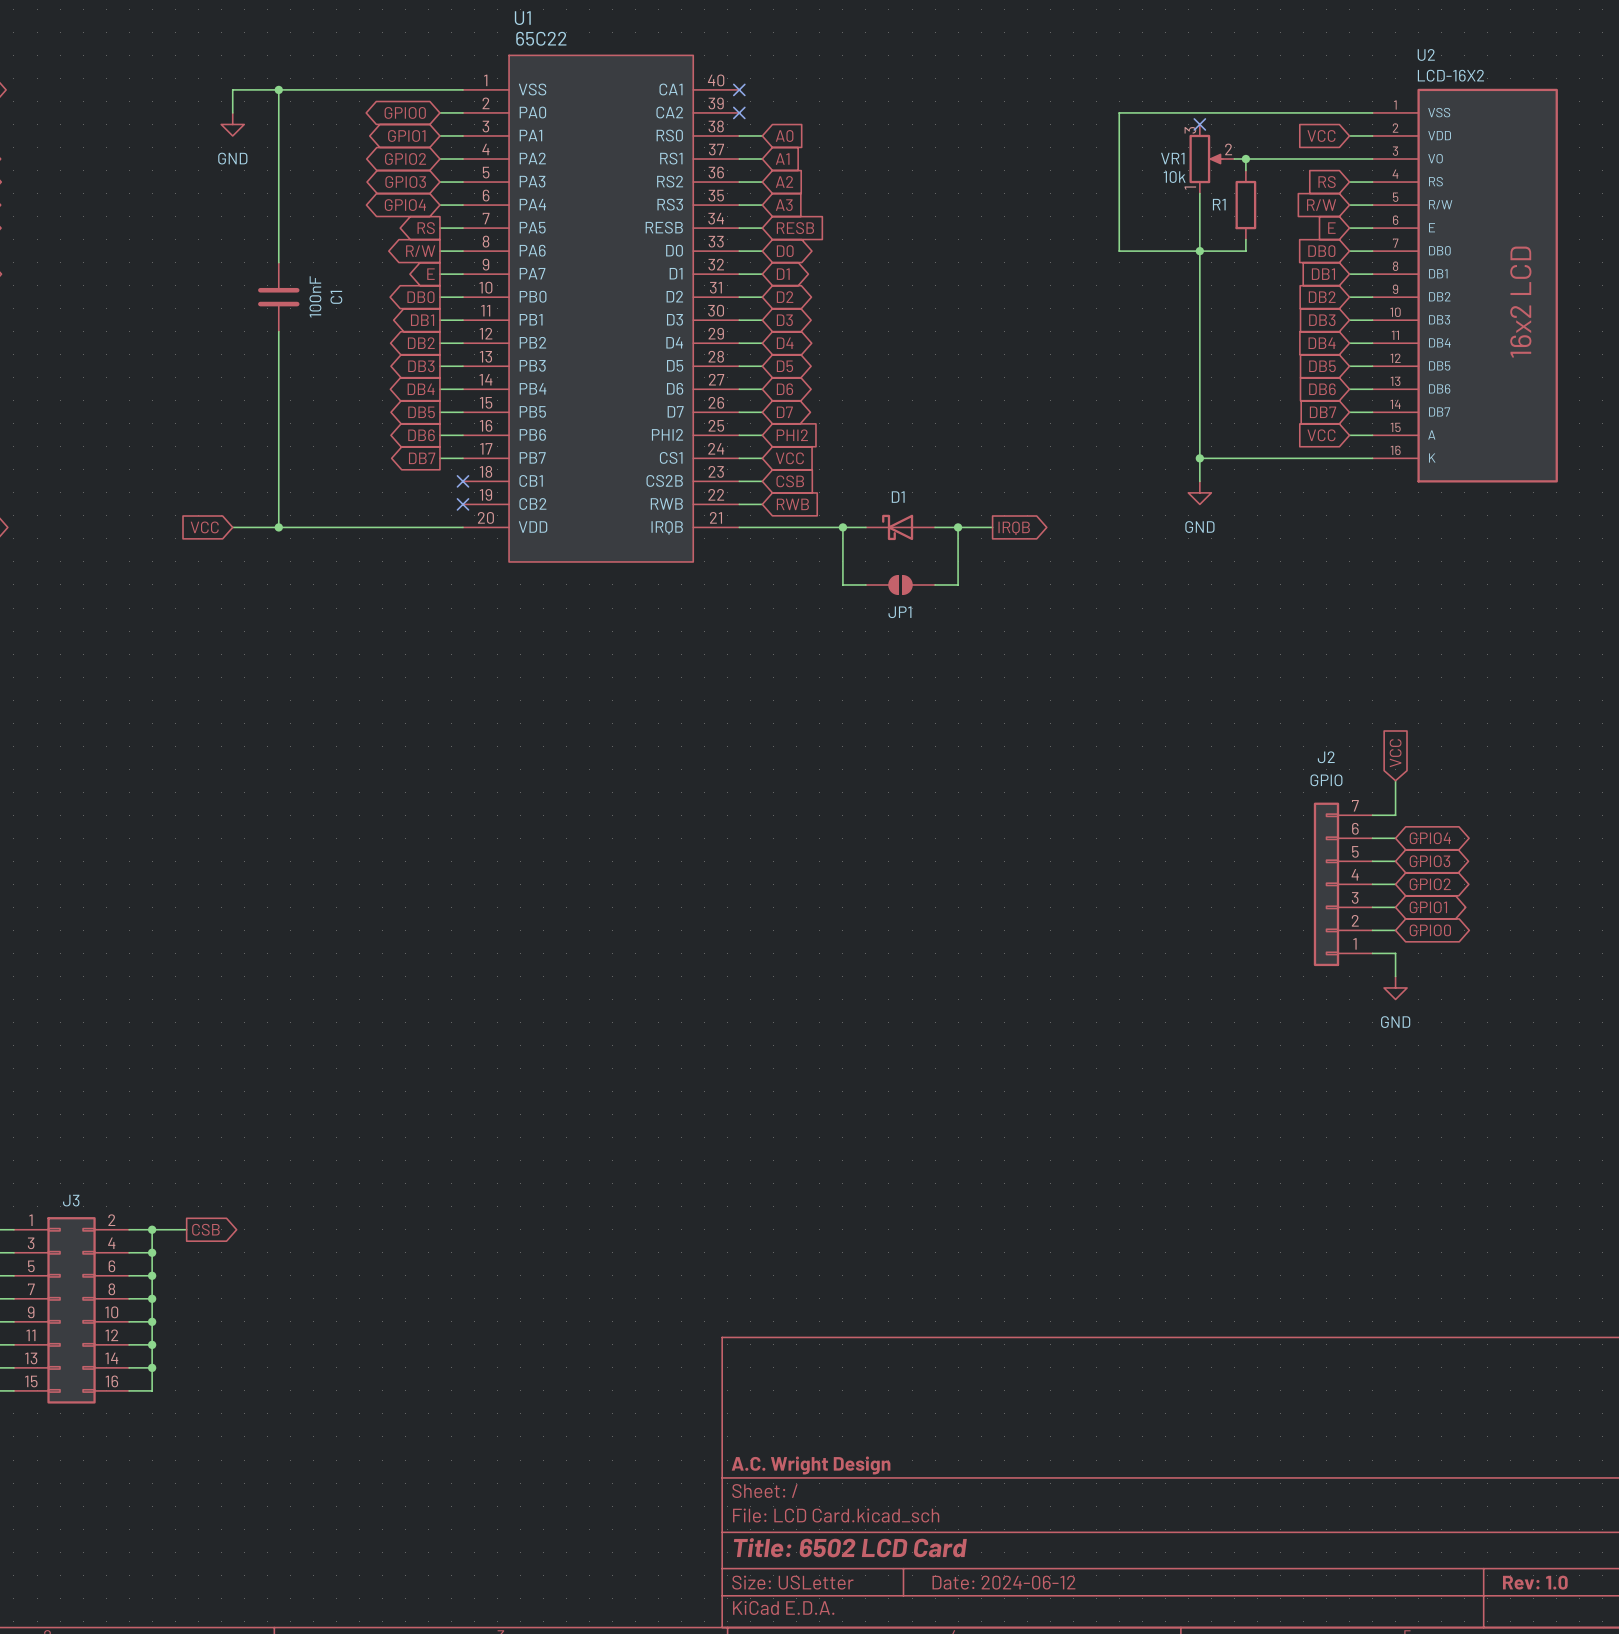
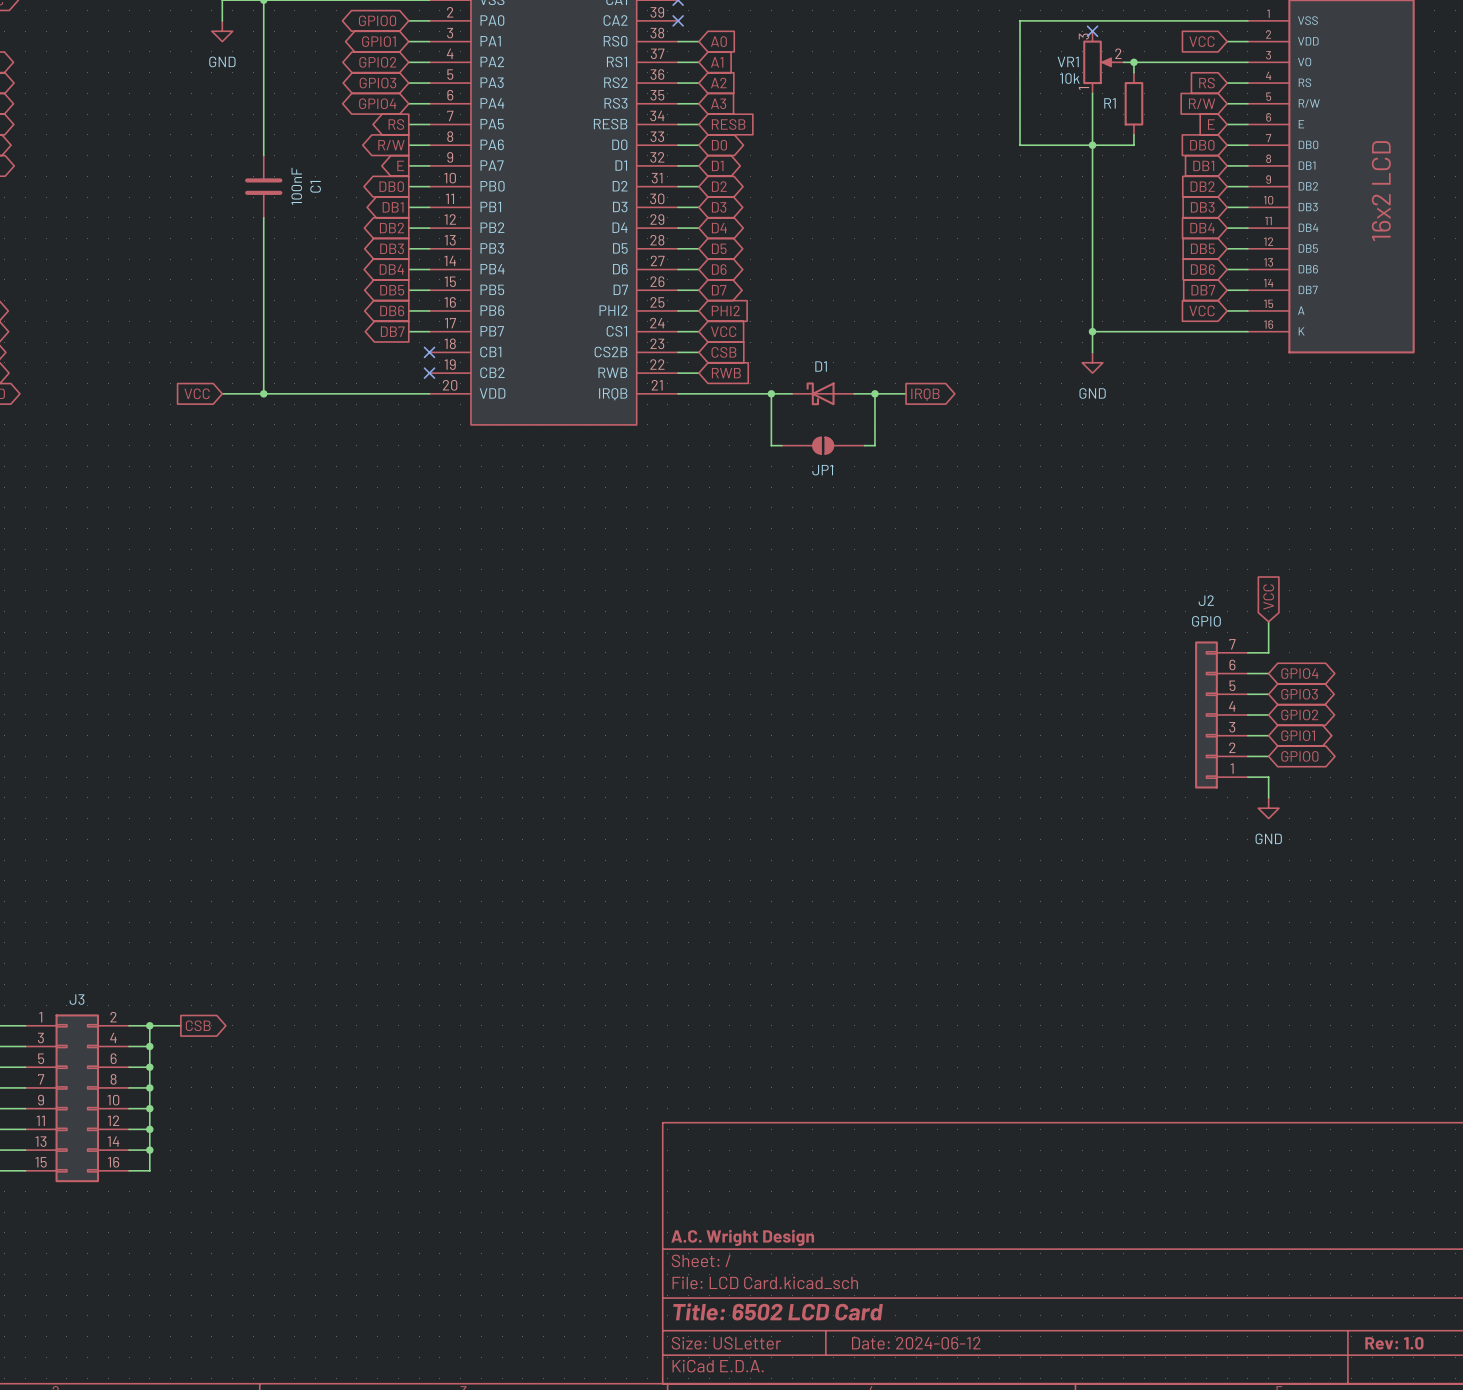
JP1 symbol: [865, 575, 936, 595] -> [781, 436, 865, 455]

